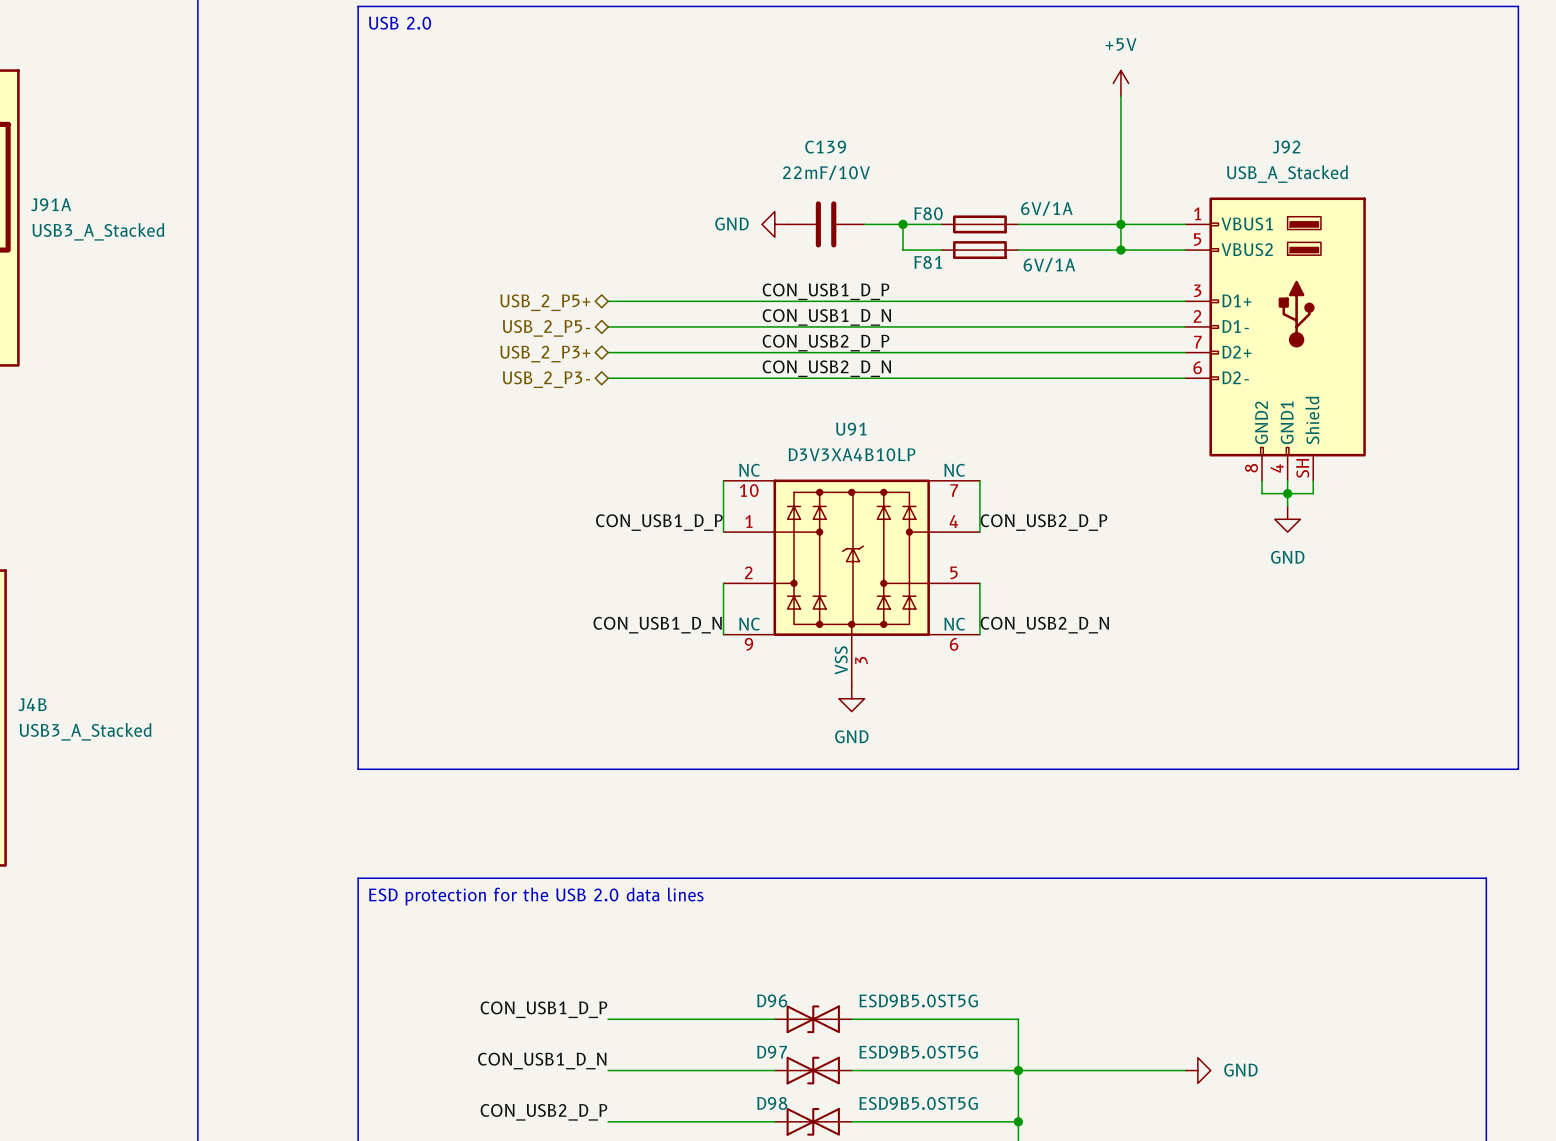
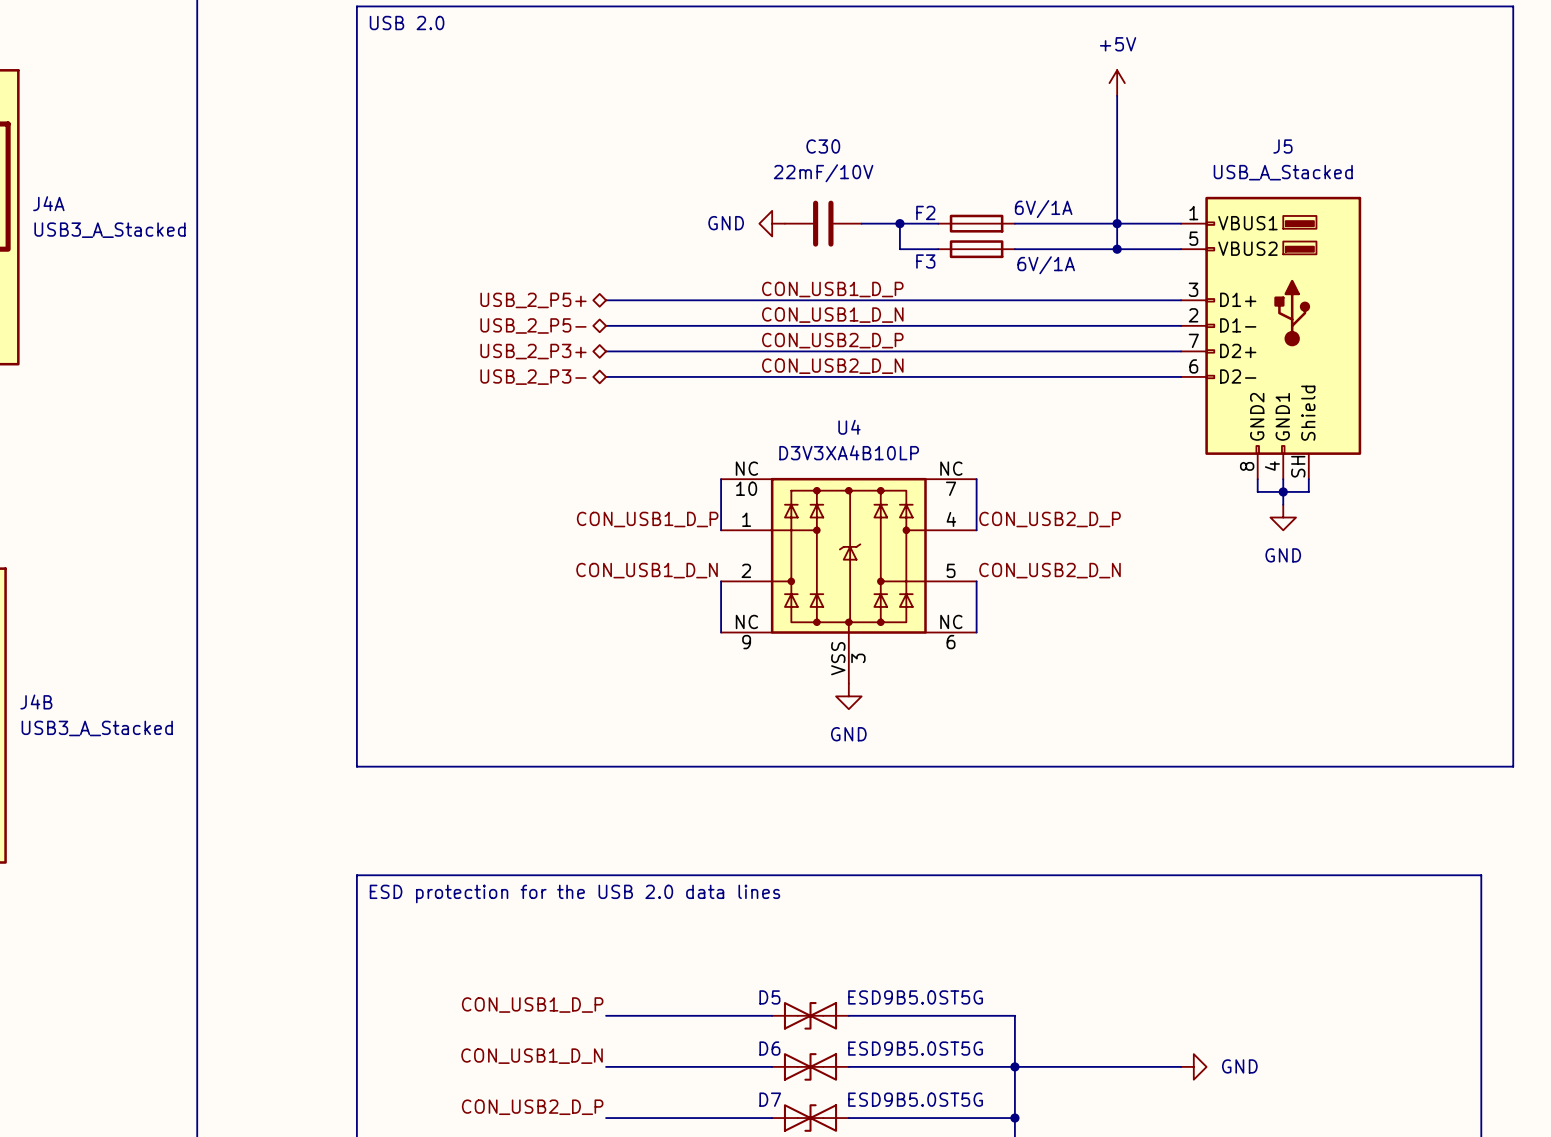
C139 name: C139 (825, 147) -> C30 (823, 146)
J92 name: J92 (1286, 147) -> J5 (1282, 146)
J91A name: J91A (51, 204) -> J4A (48, 203)
F80 name: F80 (928, 213) -> F2 (925, 212)
F81 name: F81 (928, 262) -> F3 (925, 261)
U91 name: U91 (851, 429) -> U4 (849, 427)
label position: CON_USB1_D_N (657, 625) -> CON_USB1_D_N (647, 570)
label position: CON_USB2_D_N (1044, 625) -> CON_USB2_D_N (1050, 570)
D96 name: D96 (772, 1000) -> D5 (769, 997)
D97 name: D97 (772, 1052) -> D6 (769, 1048)
D98 name: D98 (772, 1103) -> D7 (770, 1099)

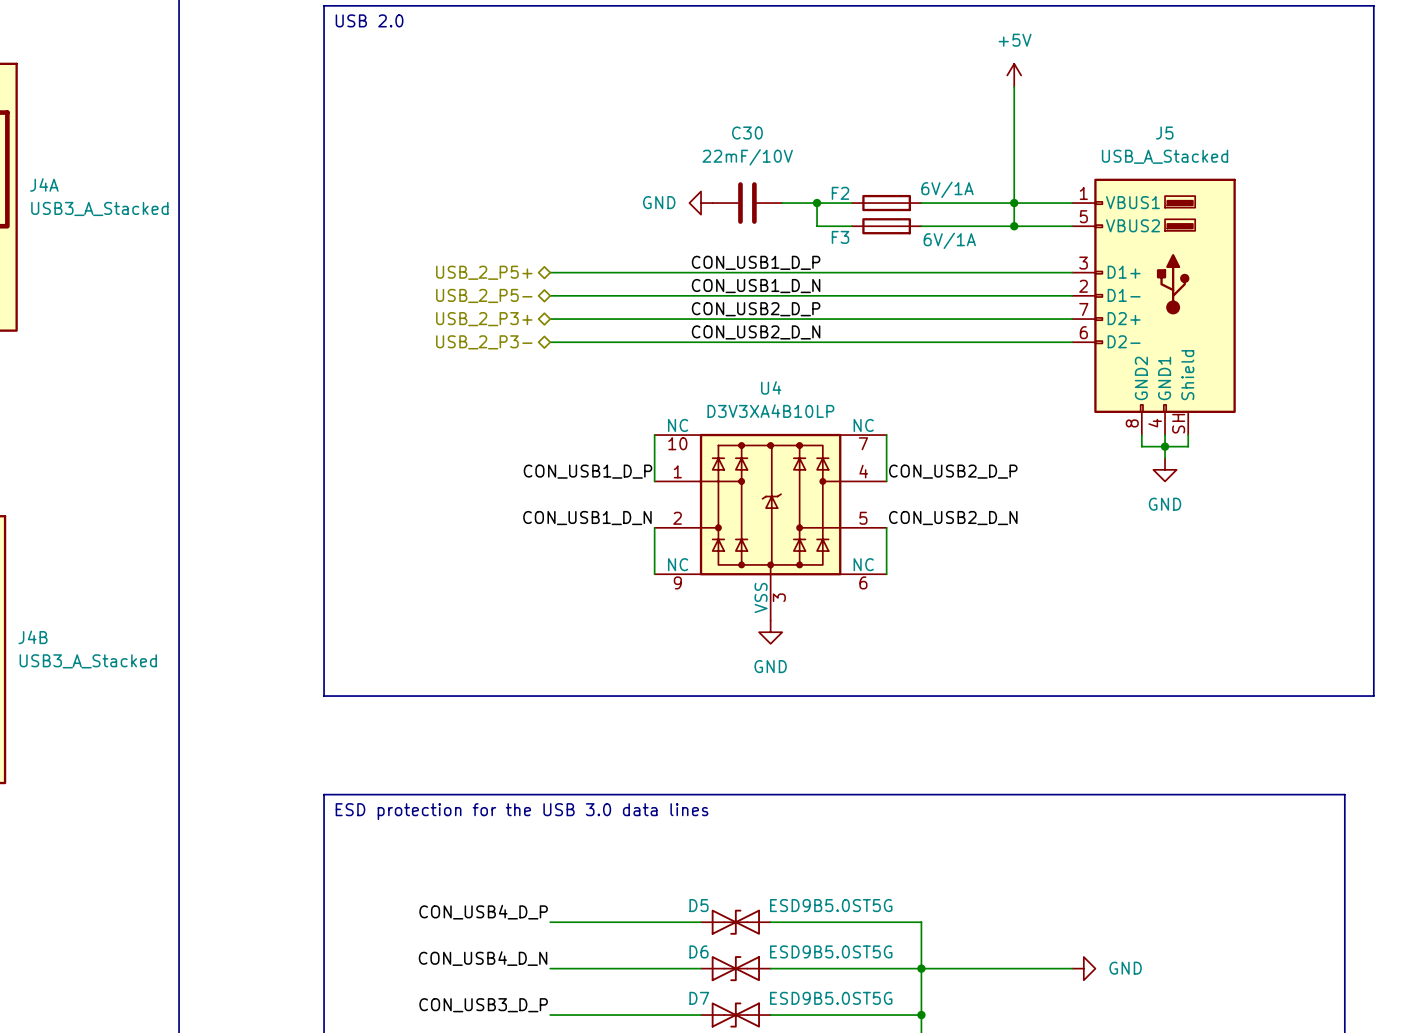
text: ESD protection for the USB 2.0 data lines (574, 893) -> ESD protection for the USB 3.0 data lines (522, 811)
label: CON_USB1_D_P (532, 1005) -> CON_USB4_D_P (483, 912)
label: CON_USB1_D_N (532, 1056) -> CON_USB4_D_N (483, 958)
label: CON_USB2_D_P (532, 1107) -> CON_USB3_D_P (483, 1005)

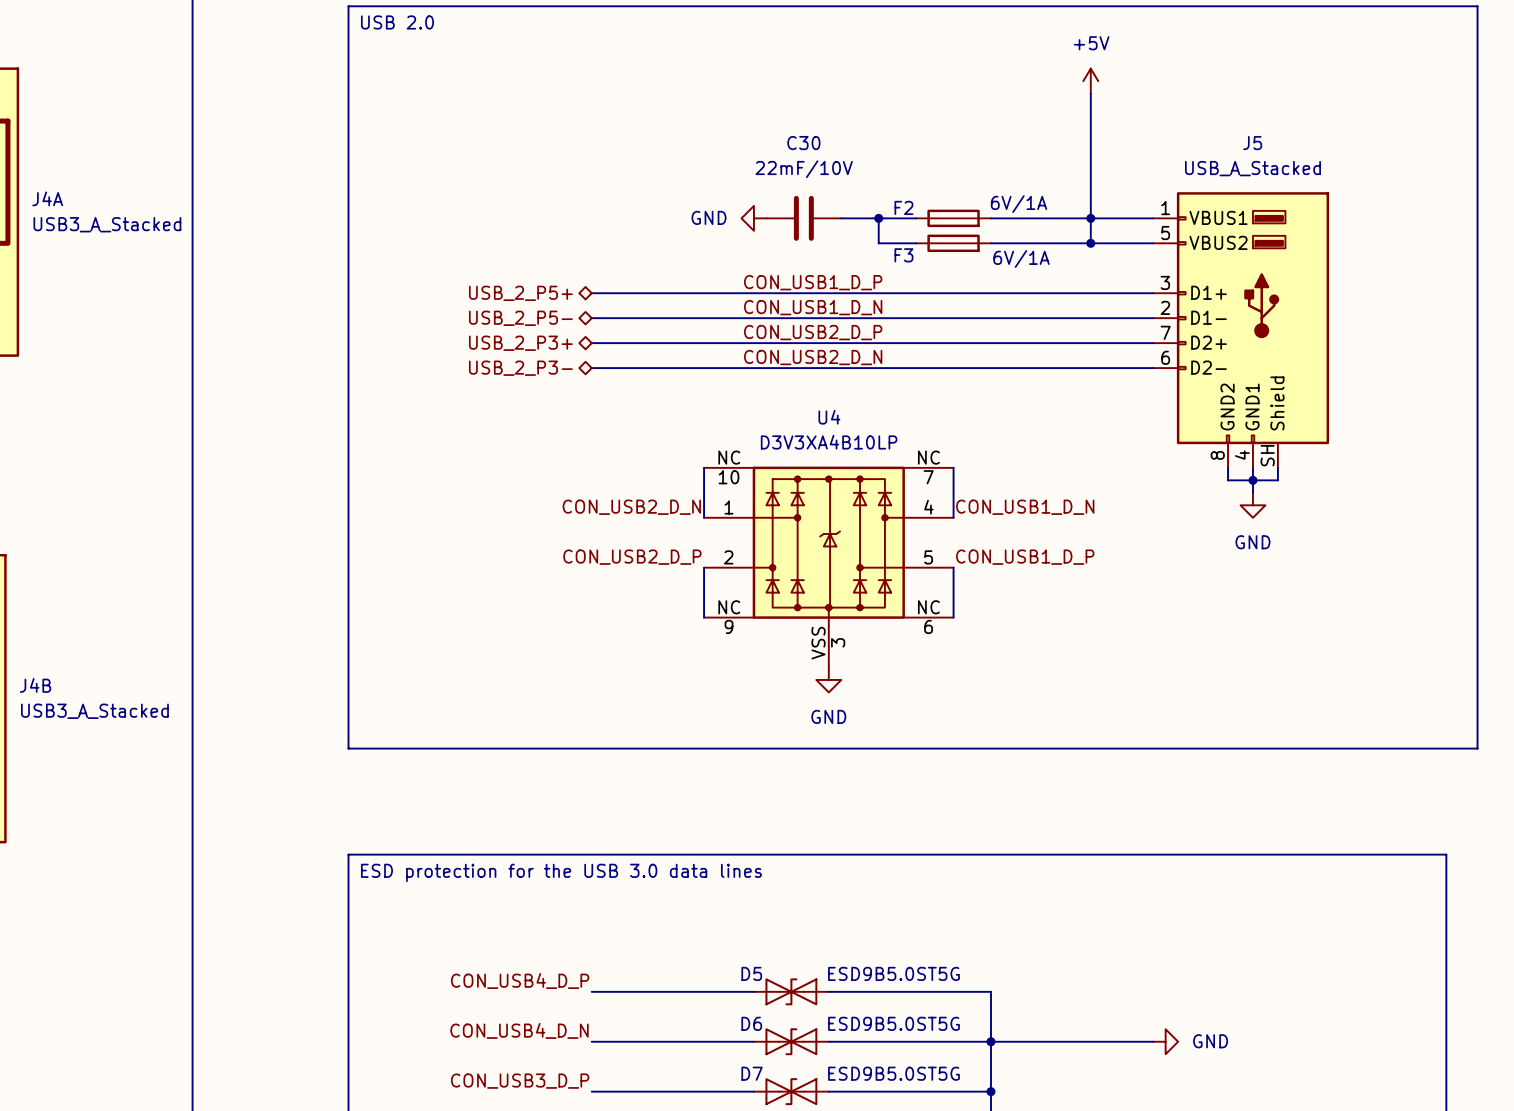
label: CON_USB1_D_P (587, 471) -> CON_USB2_D_N (631, 507)
label: CON_USB2_D_P (953, 471) -> CON_USB1_D_N (1025, 507)
label: CON_USB1_D_N (587, 518) -> CON_USB2_D_P (632, 557)
label: CON_USB2_D_N (953, 518) -> CON_USB1_D_P (1025, 557)

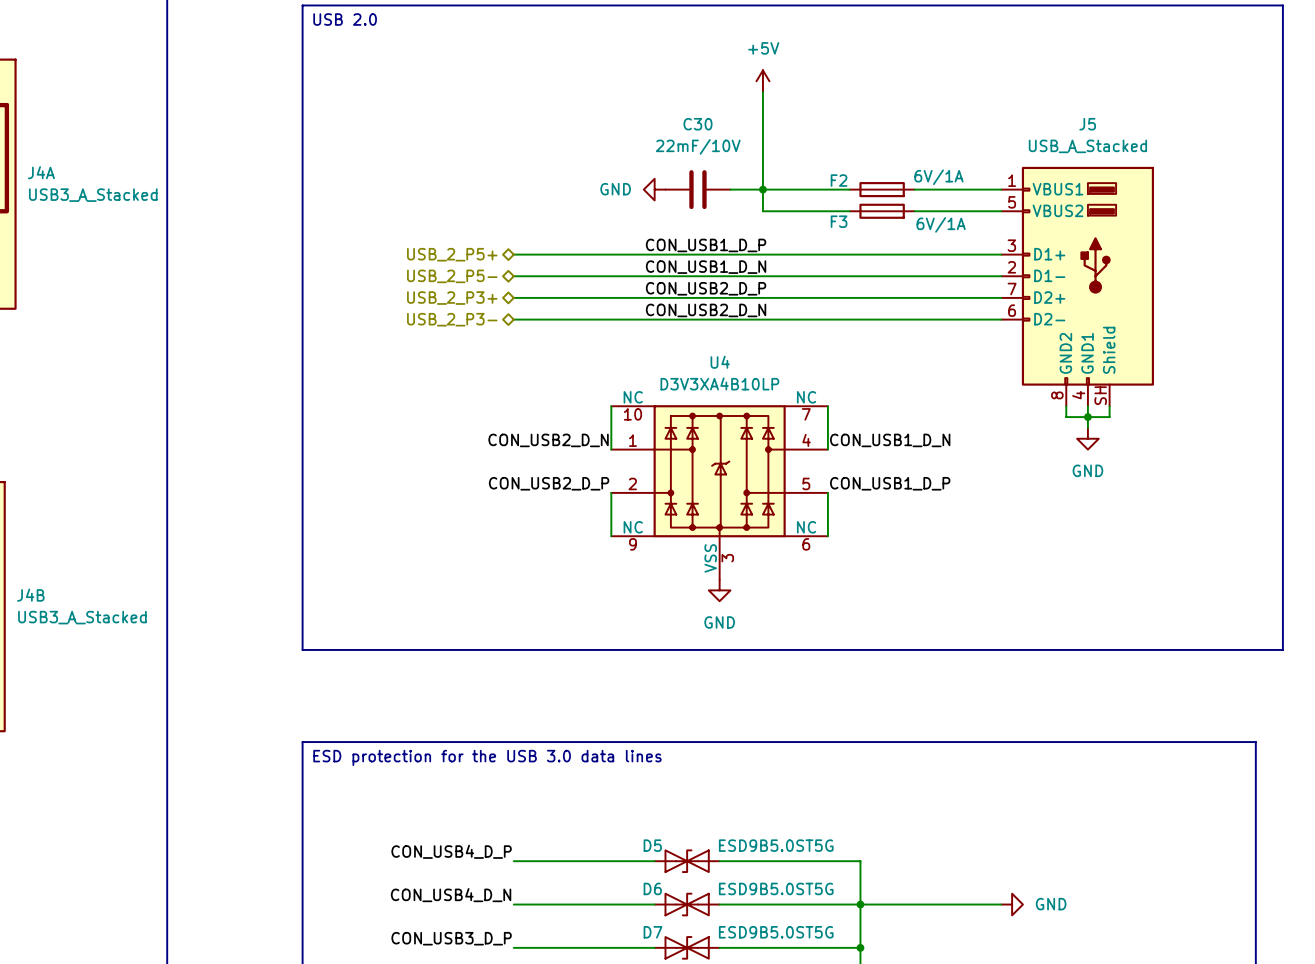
power symbol position: +5V (1090, 81) -> +5V (762, 81)
wire: (1090, 93) (1090, 243) -> none
wire: none -> (762, 92) (762, 189)
F2 position: (953, 218) -> (882, 189)
junction: (1090, 218) -> none
F3 position: (953, 243) -> (882, 211)
junction: (1090, 243) -> none

